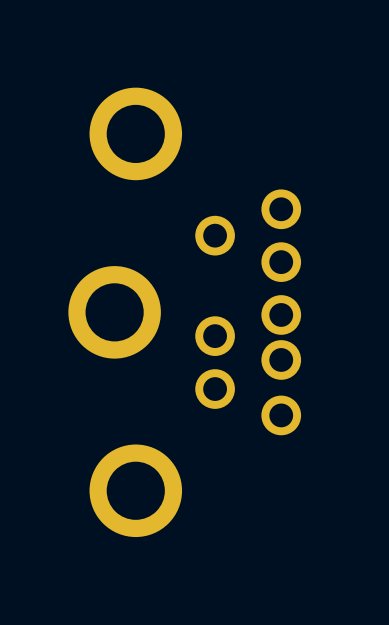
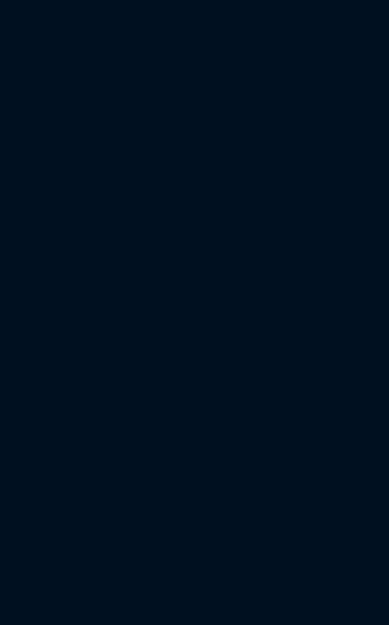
part: (184, 312) -> none

